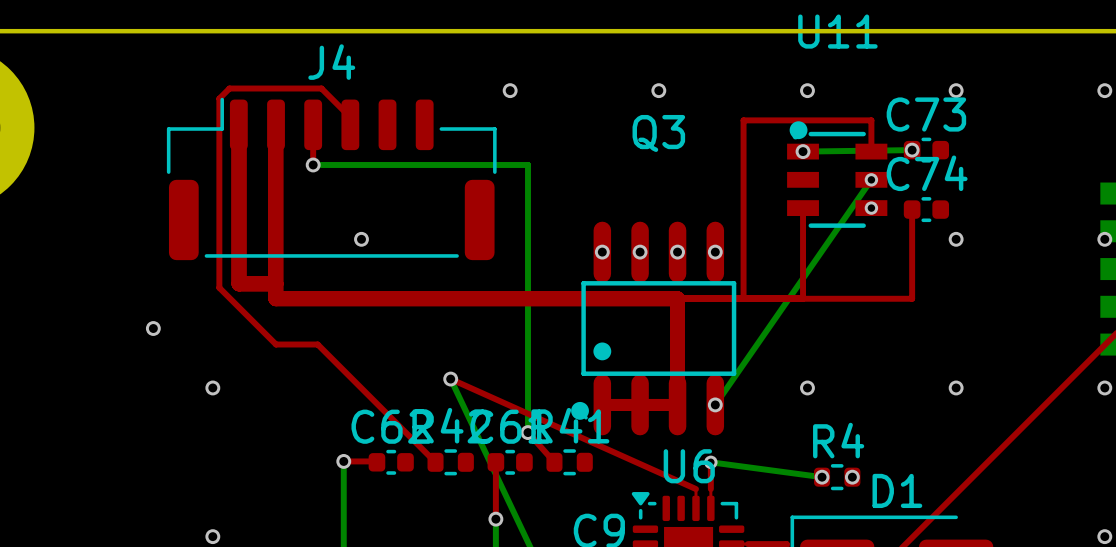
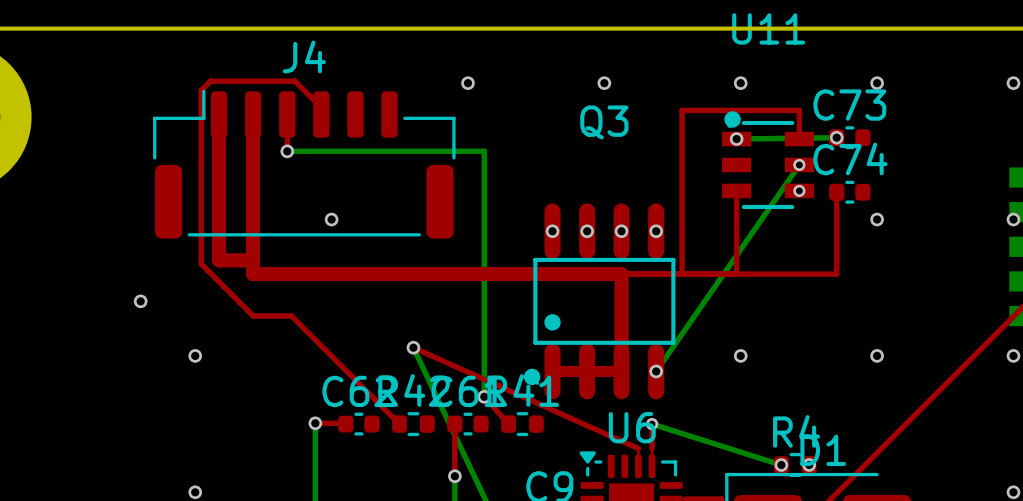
bottom track: (710, 462) (822, 477) -> (652, 424) (781, 465)
via: (822, 477) -> none
R4 position: (837, 477) -> (795, 465)
via: (852, 477) -> none
via: none -> (781, 465)
via: none -> (809, 465)

